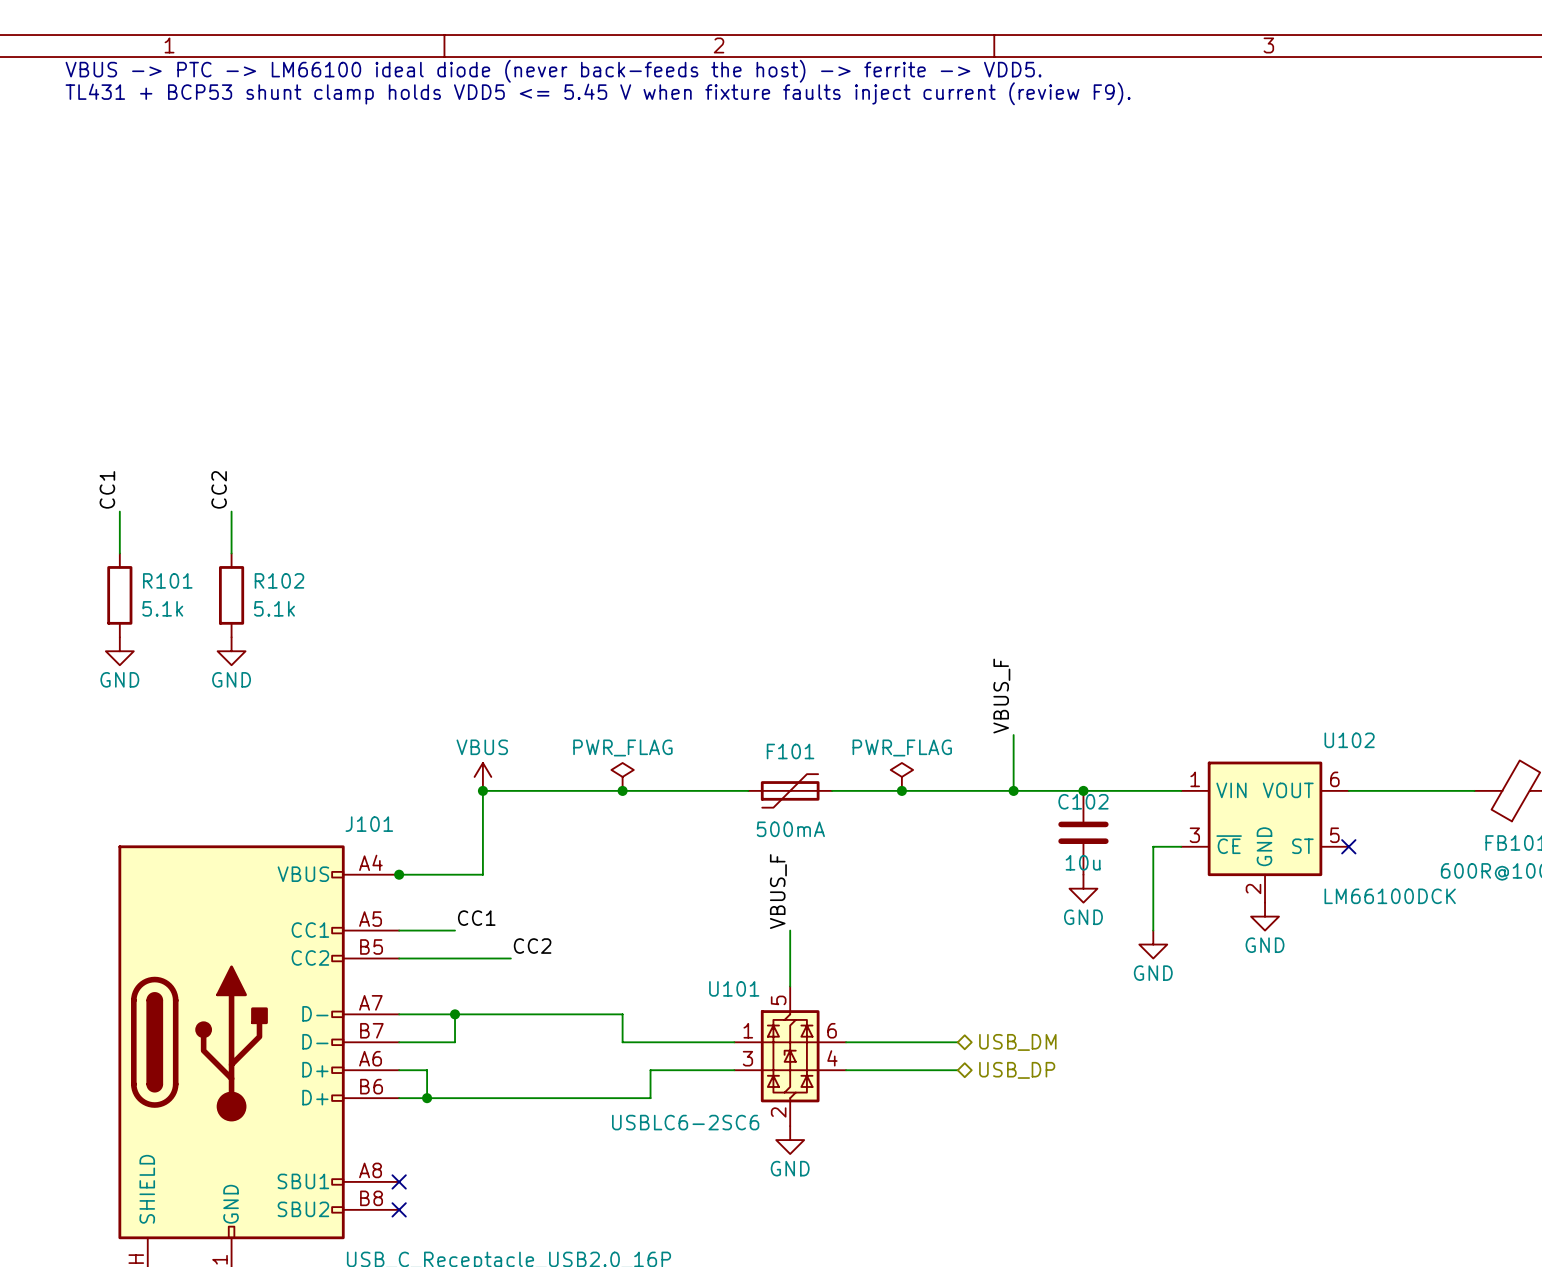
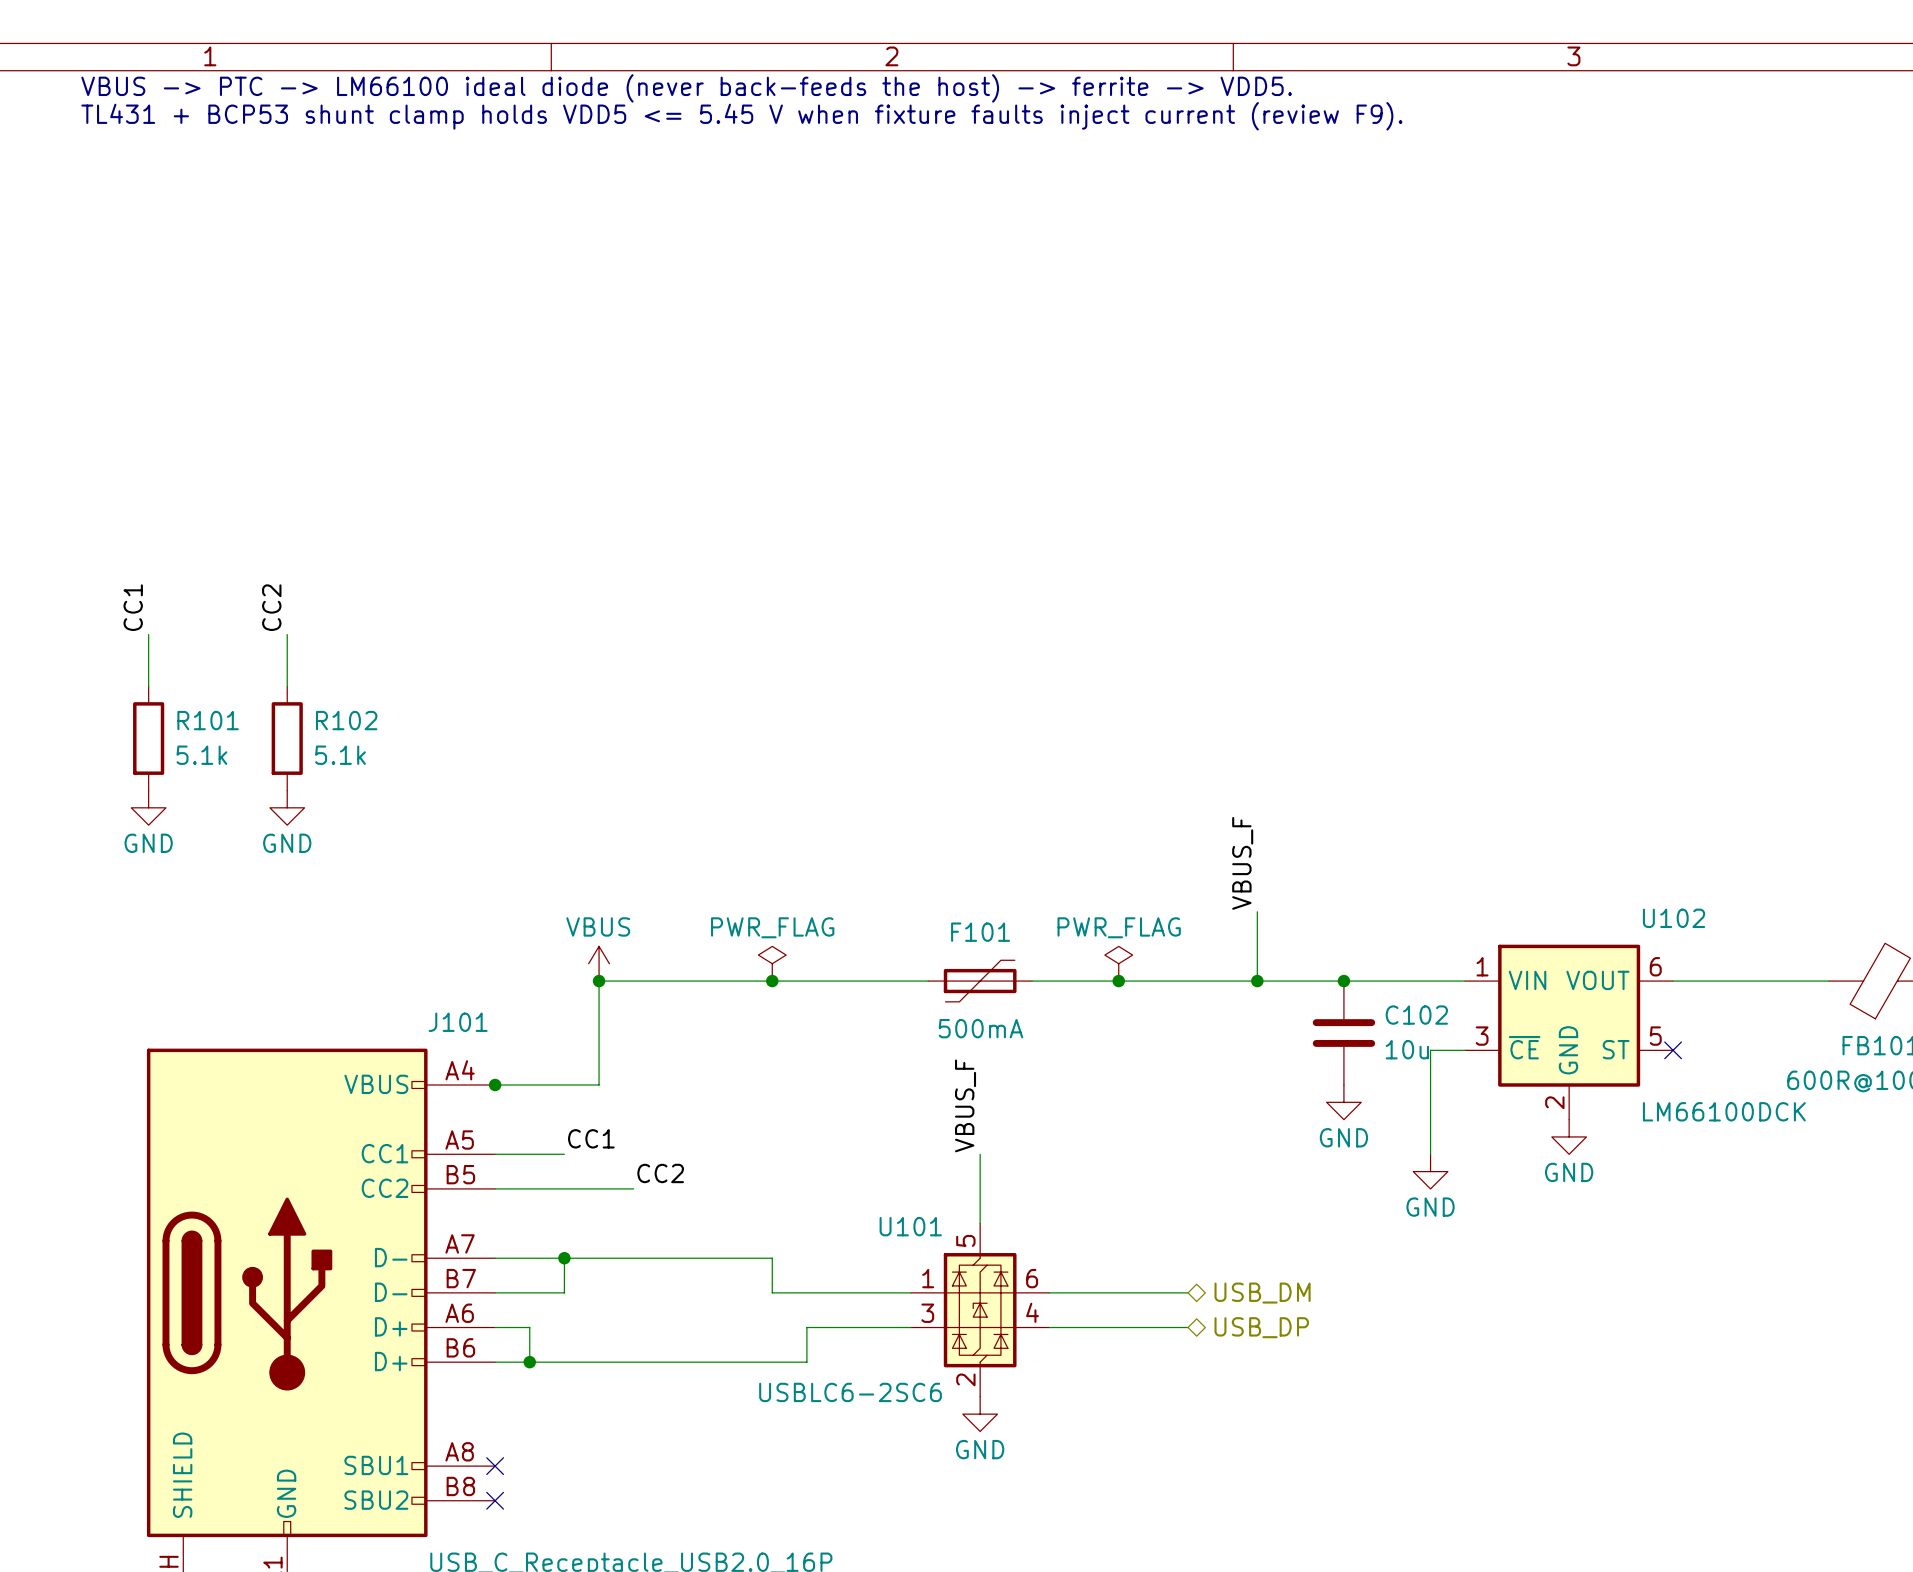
C102 name position: C102 (1083, 801) -> C102 (1416, 1015)
C102 value position: 10u (1083, 862) -> 10u (1407, 1049)

